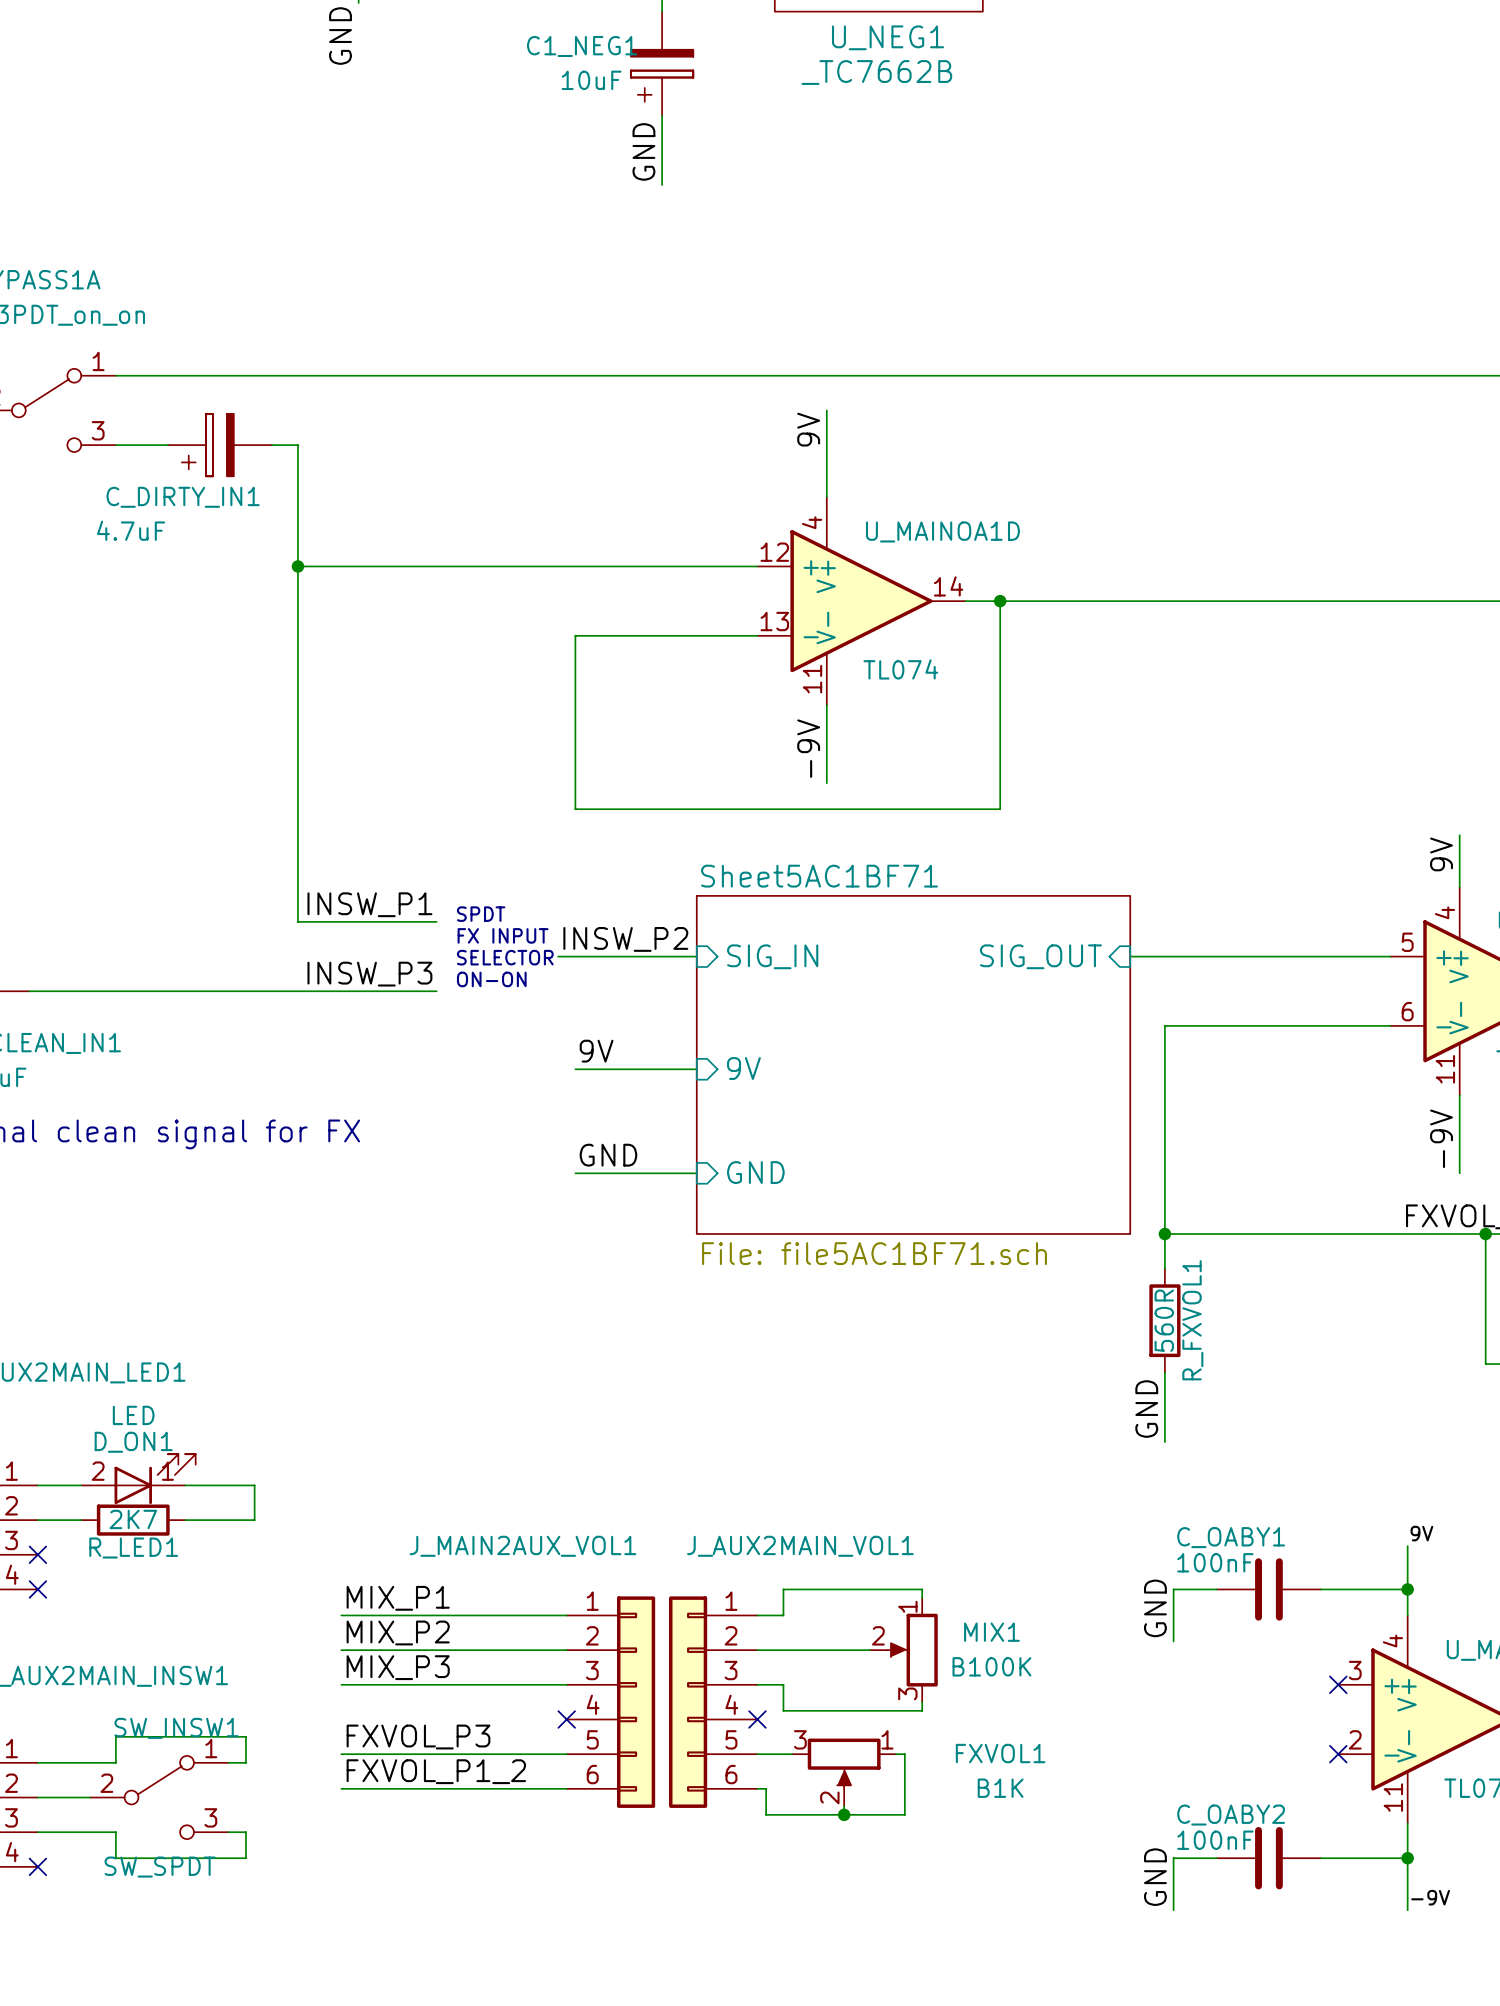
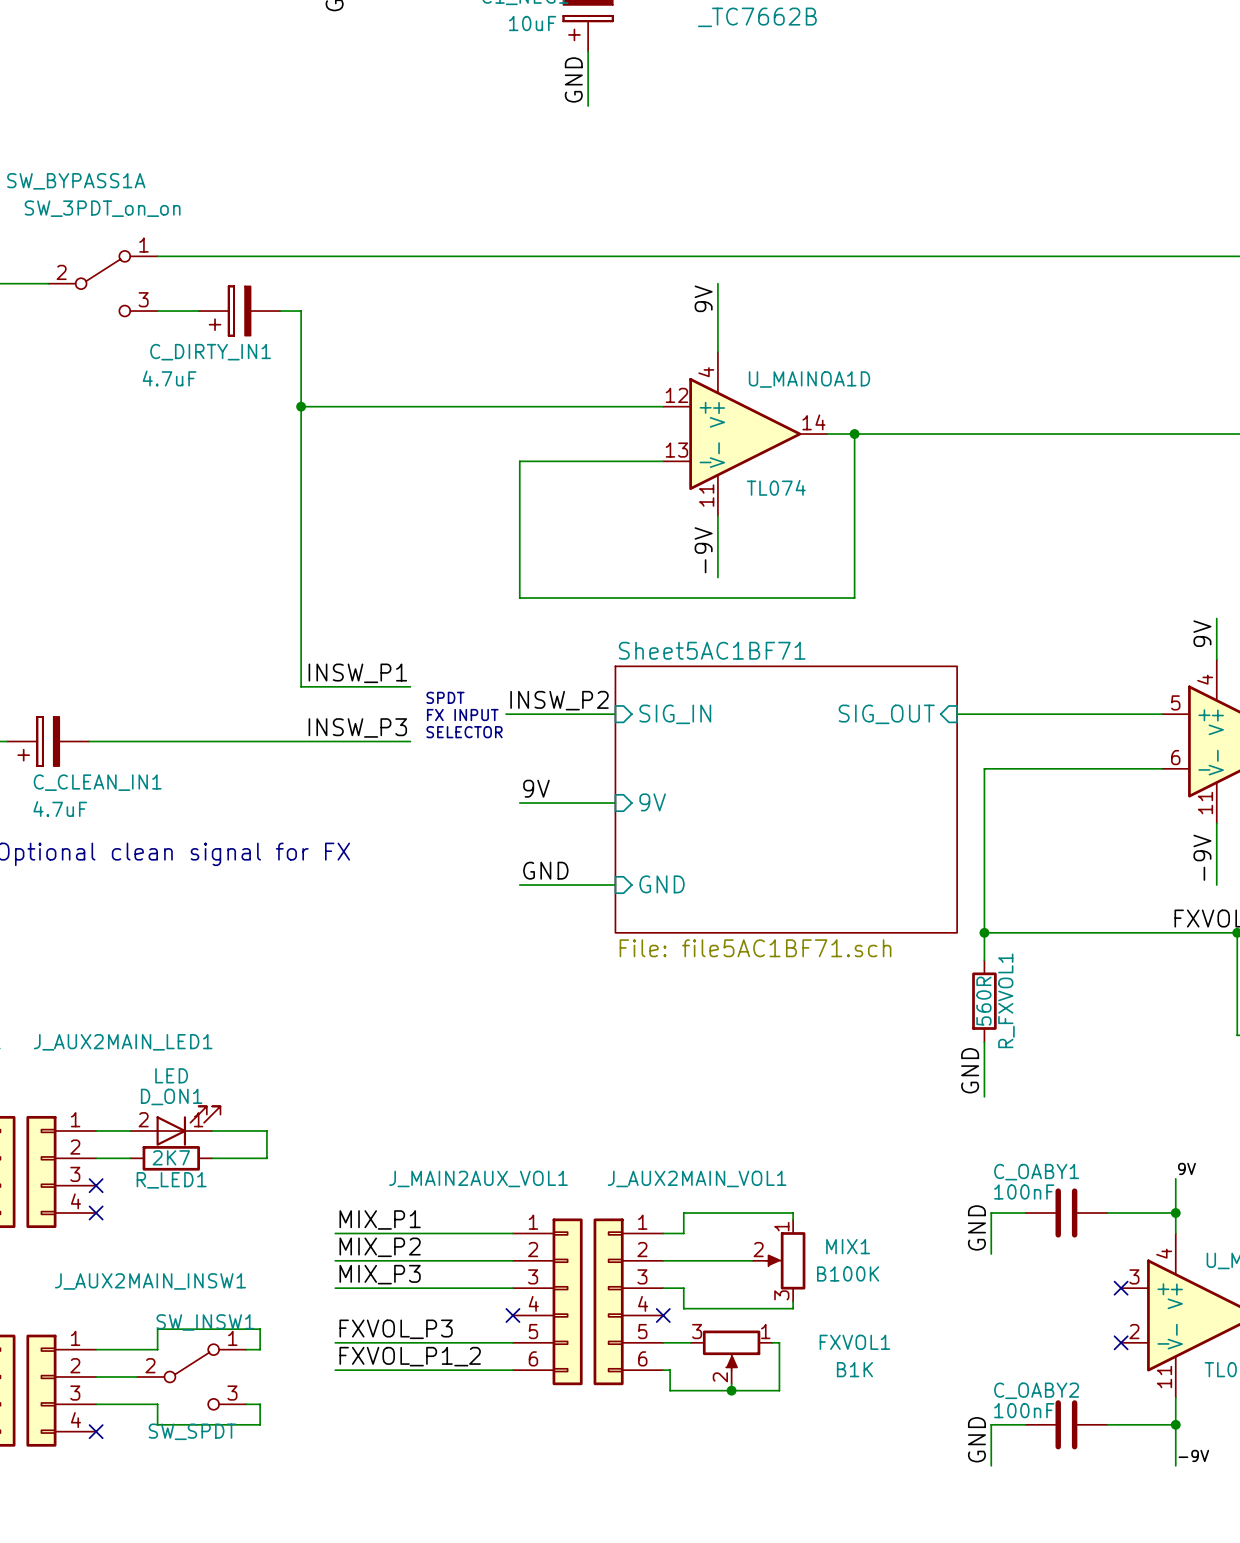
text: SPDT (481, 914) -> none
text: FX INPUT (503, 935) -> SPDT (445, 697)
text: SELECTOR (505, 957) -> FX INPUT (462, 715)
text: ON-ON (491, 979) -> SELECTOR (464, 732)

